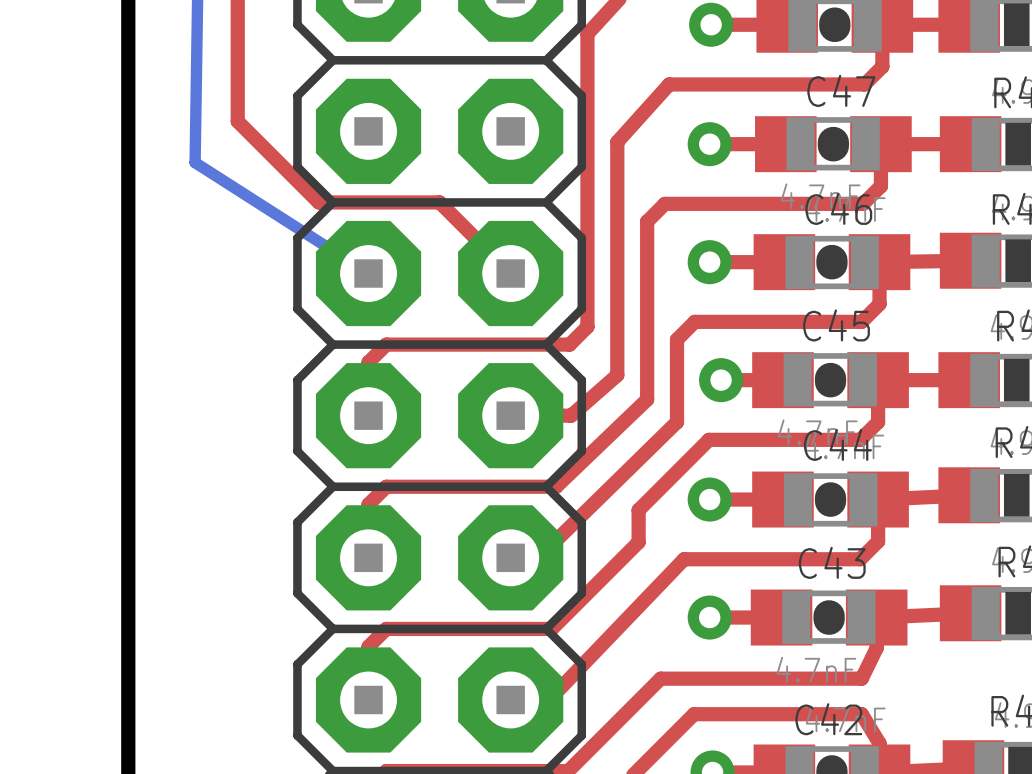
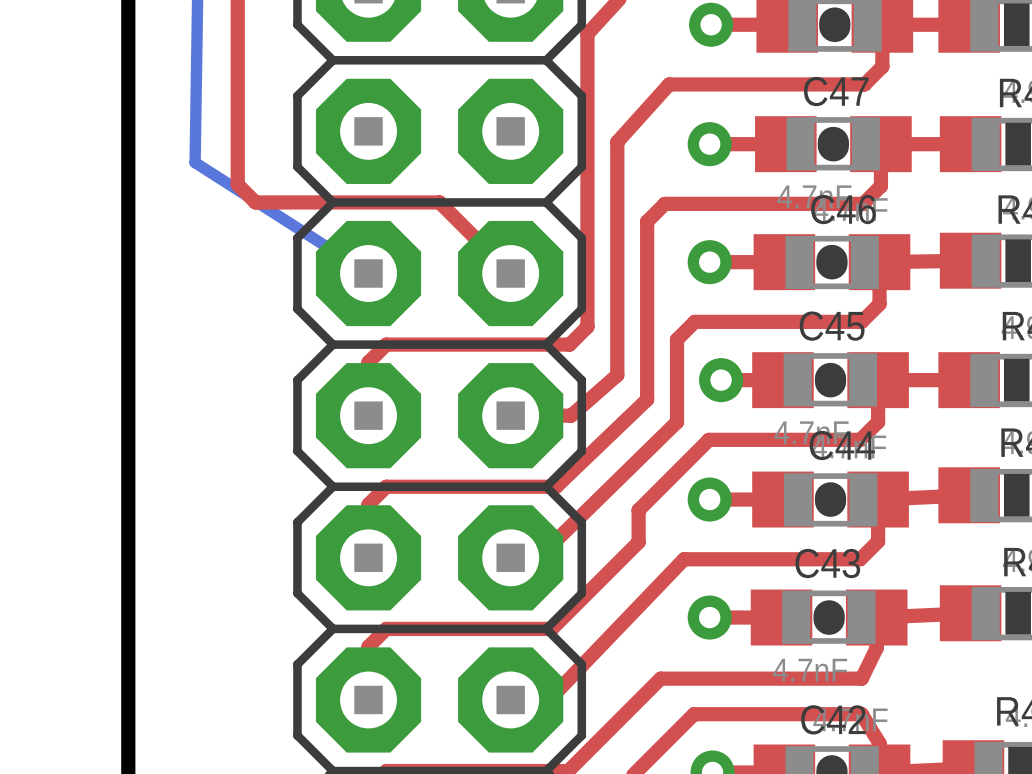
top track: (237, 121) (318, 202) -> (237, 121) (237, 184) (255, 202) (318, 202)

